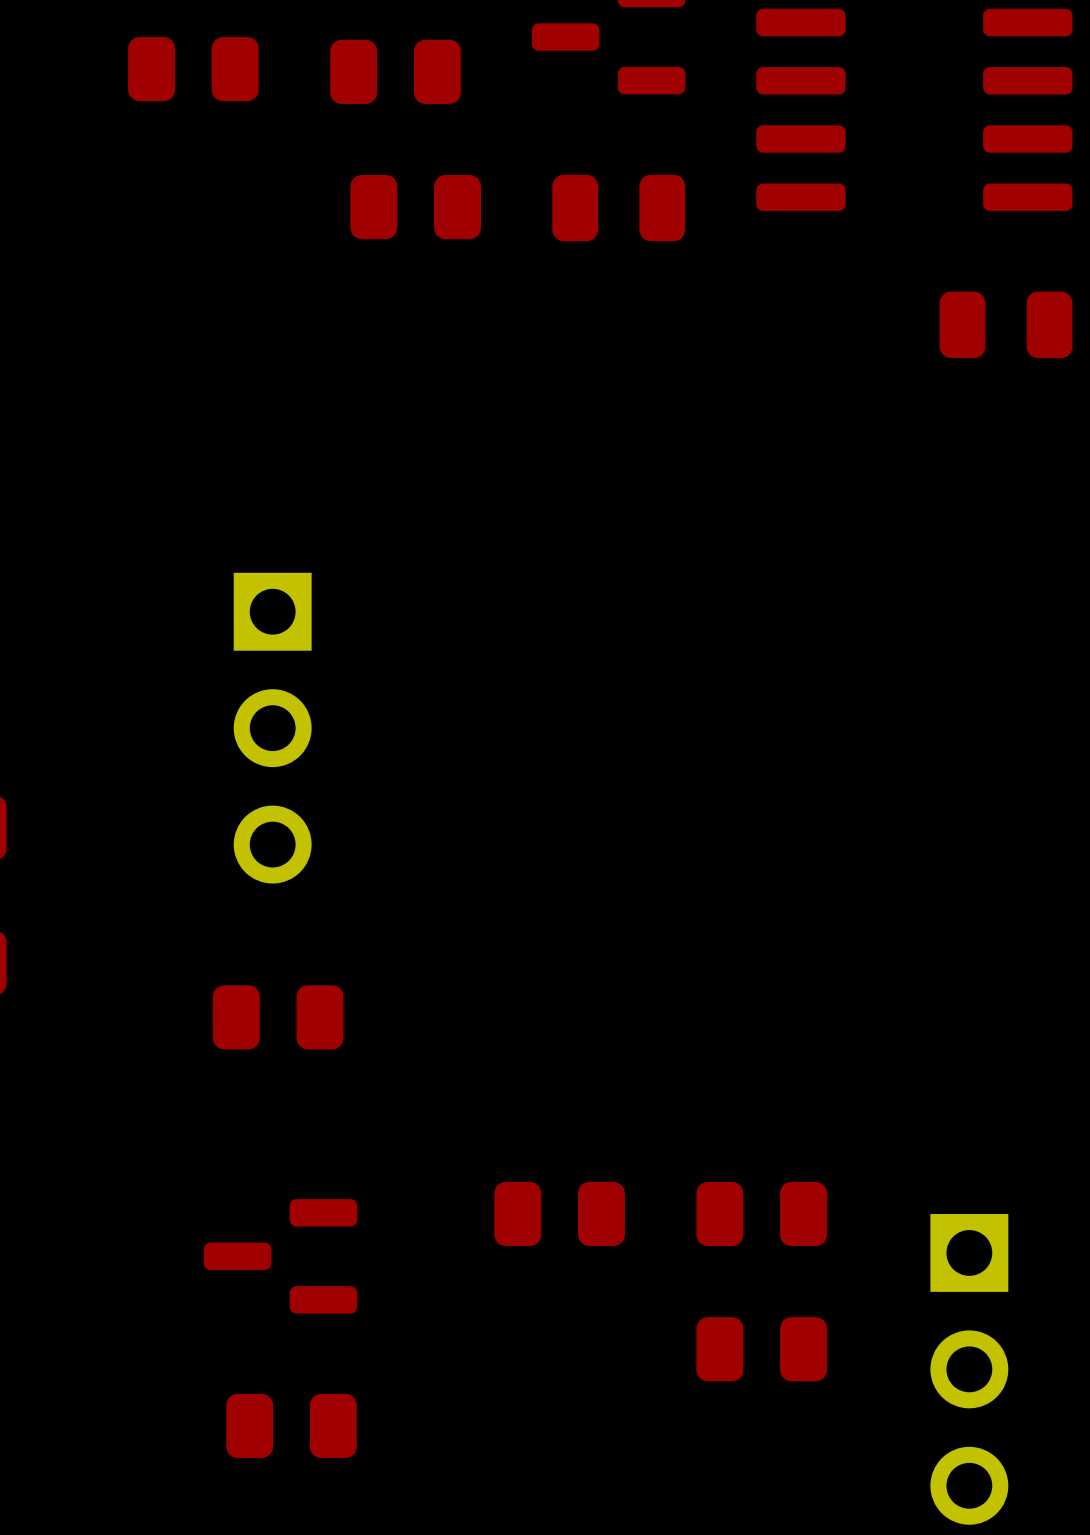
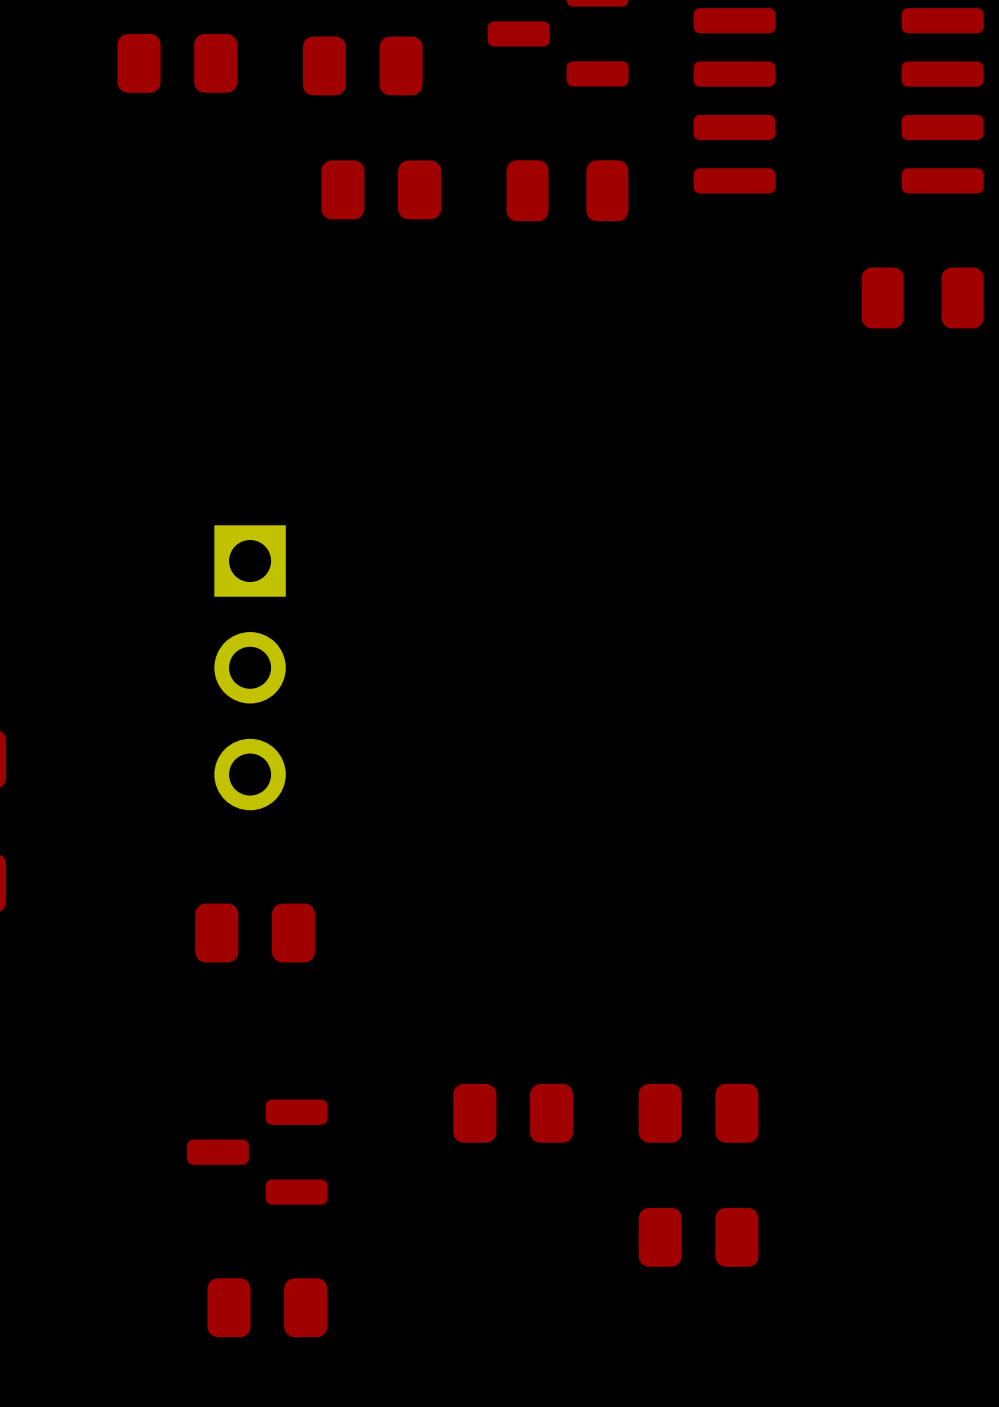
part: (969, 1369) -> none

